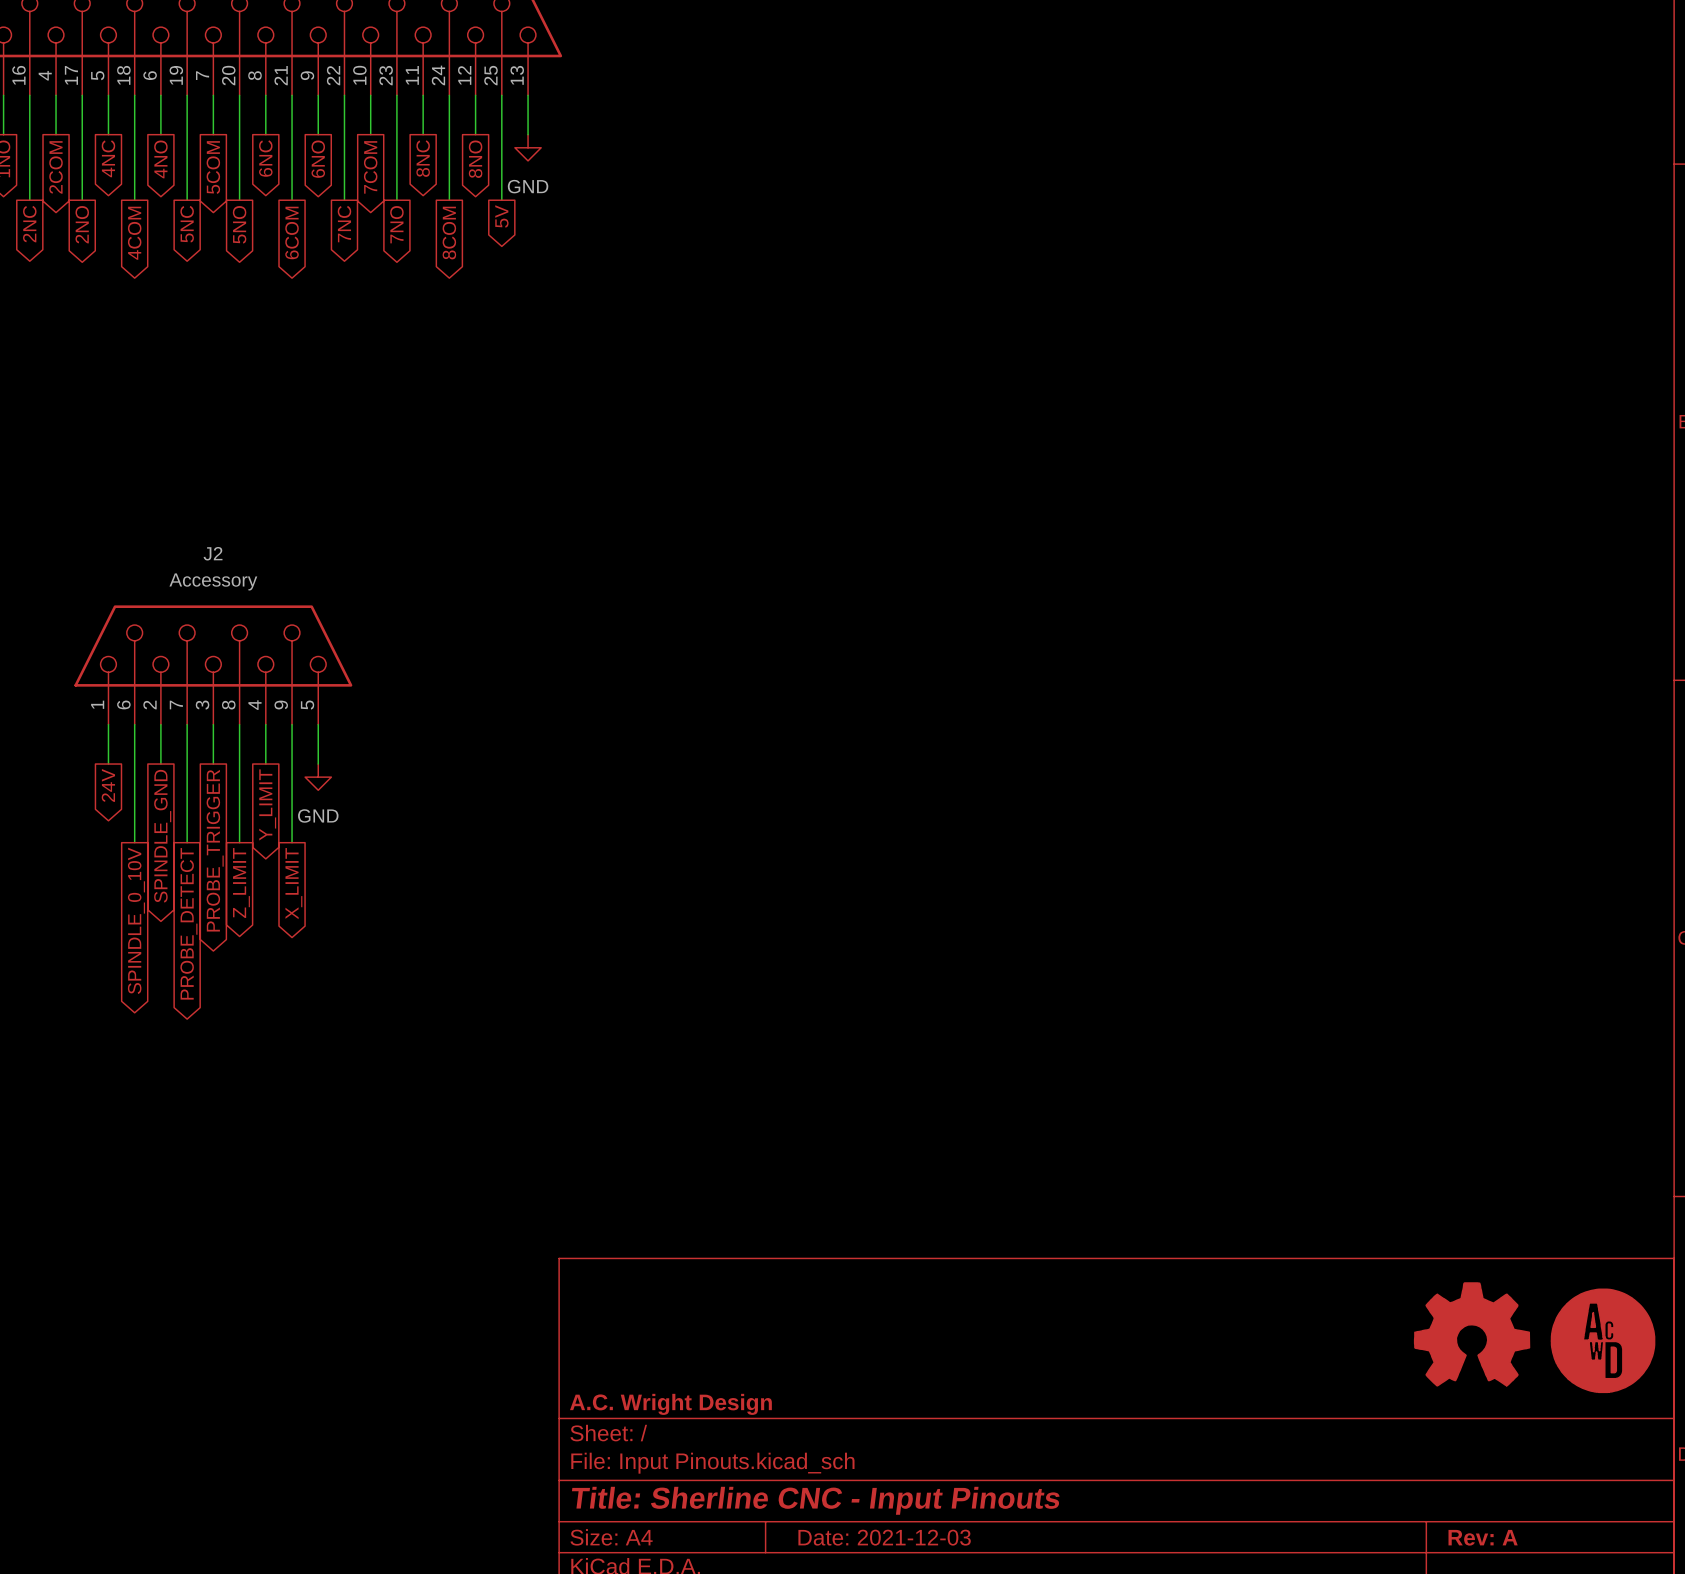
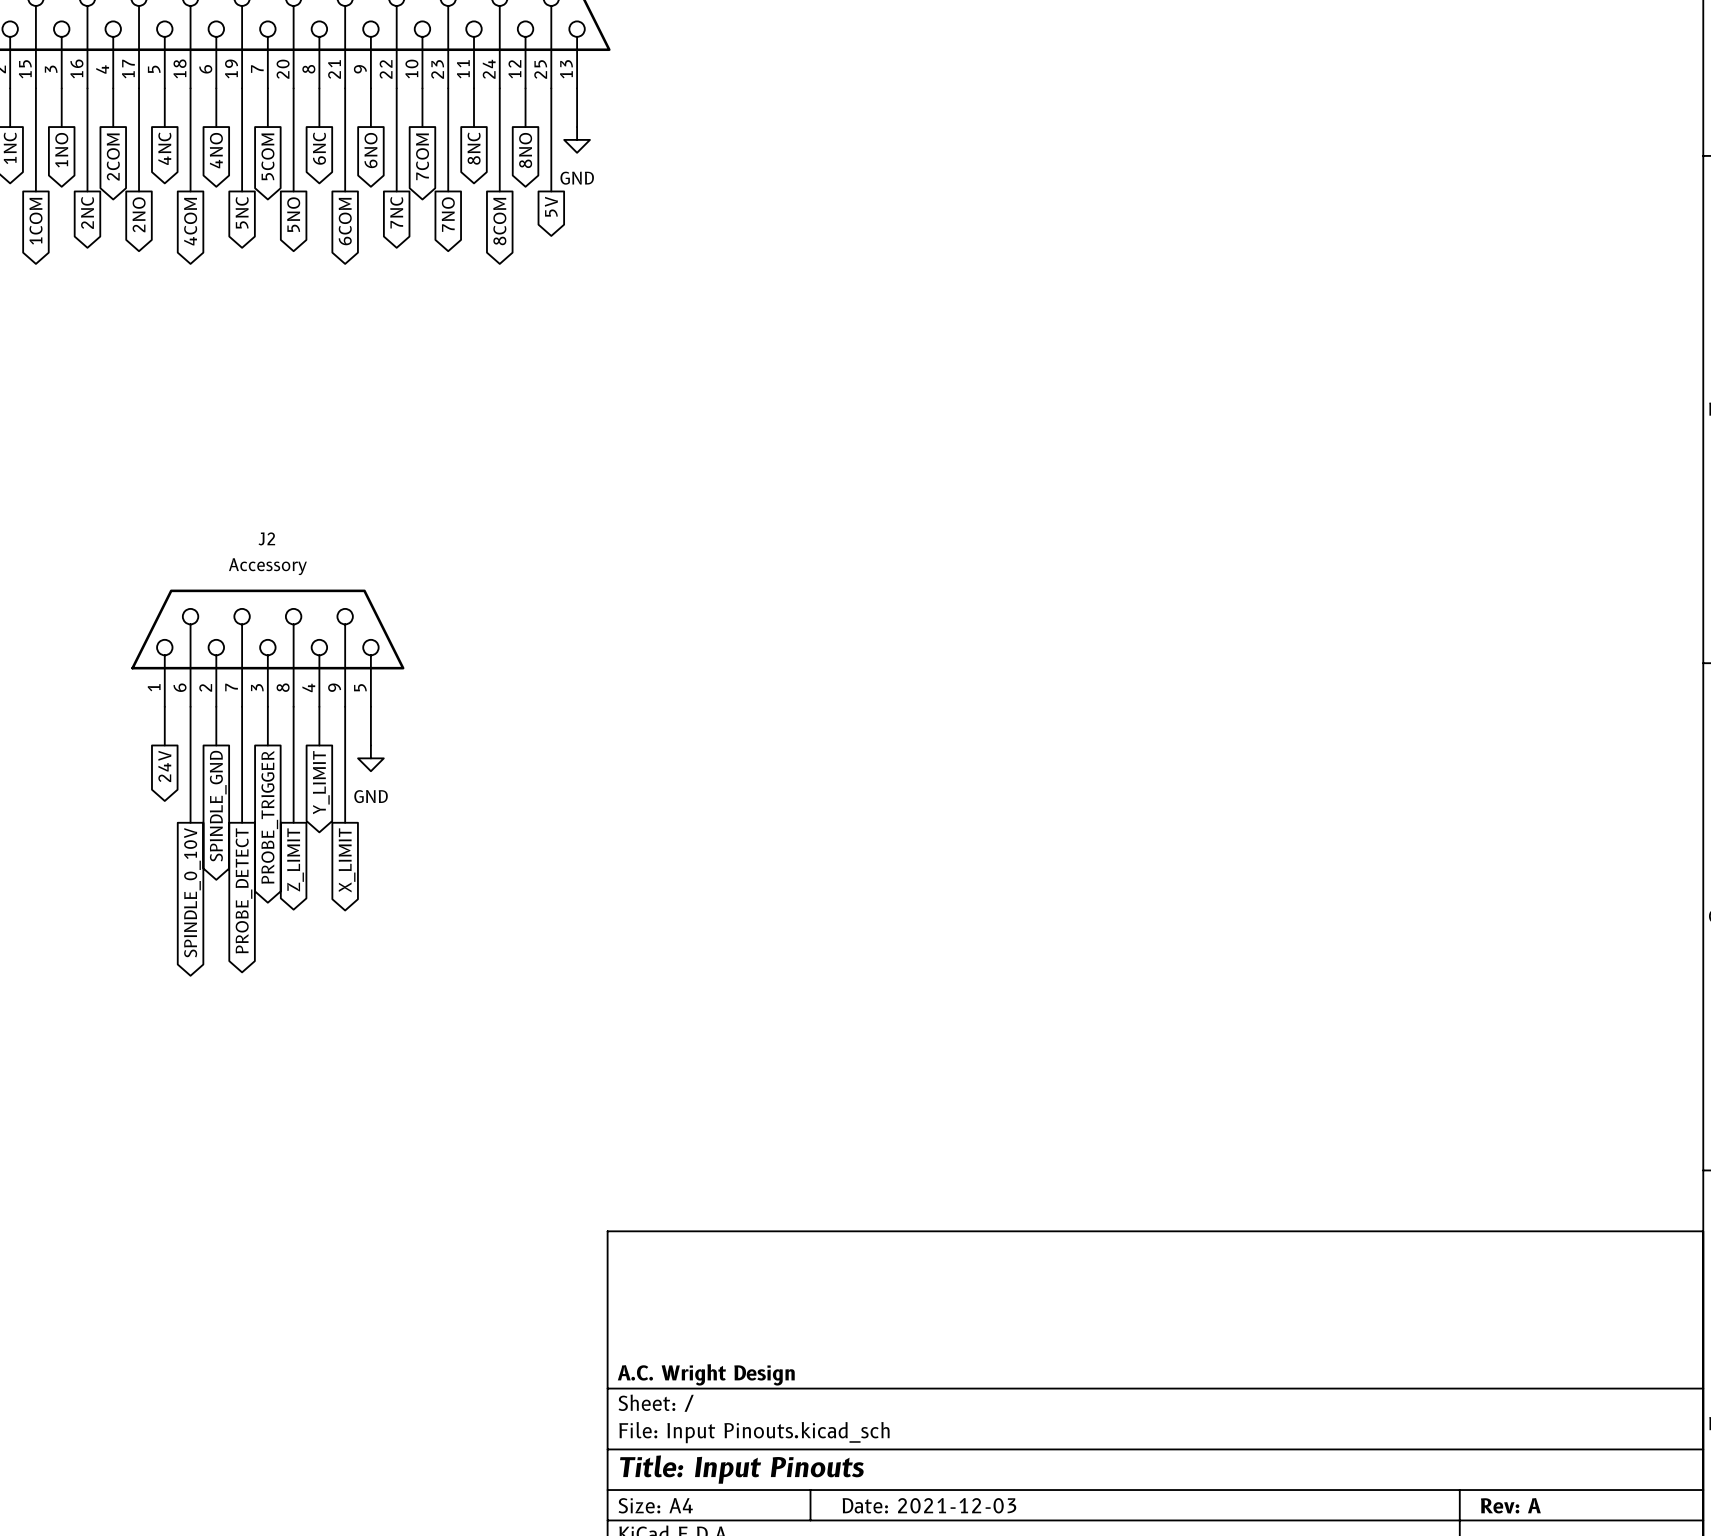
power symbol: (1472, 1334) -> none
power symbol: (1603, 1340) -> none
title block: Title: Sherline CNC - Input Pinouts (815, 1500) -> Title: Input Pinouts (741, 1469)

